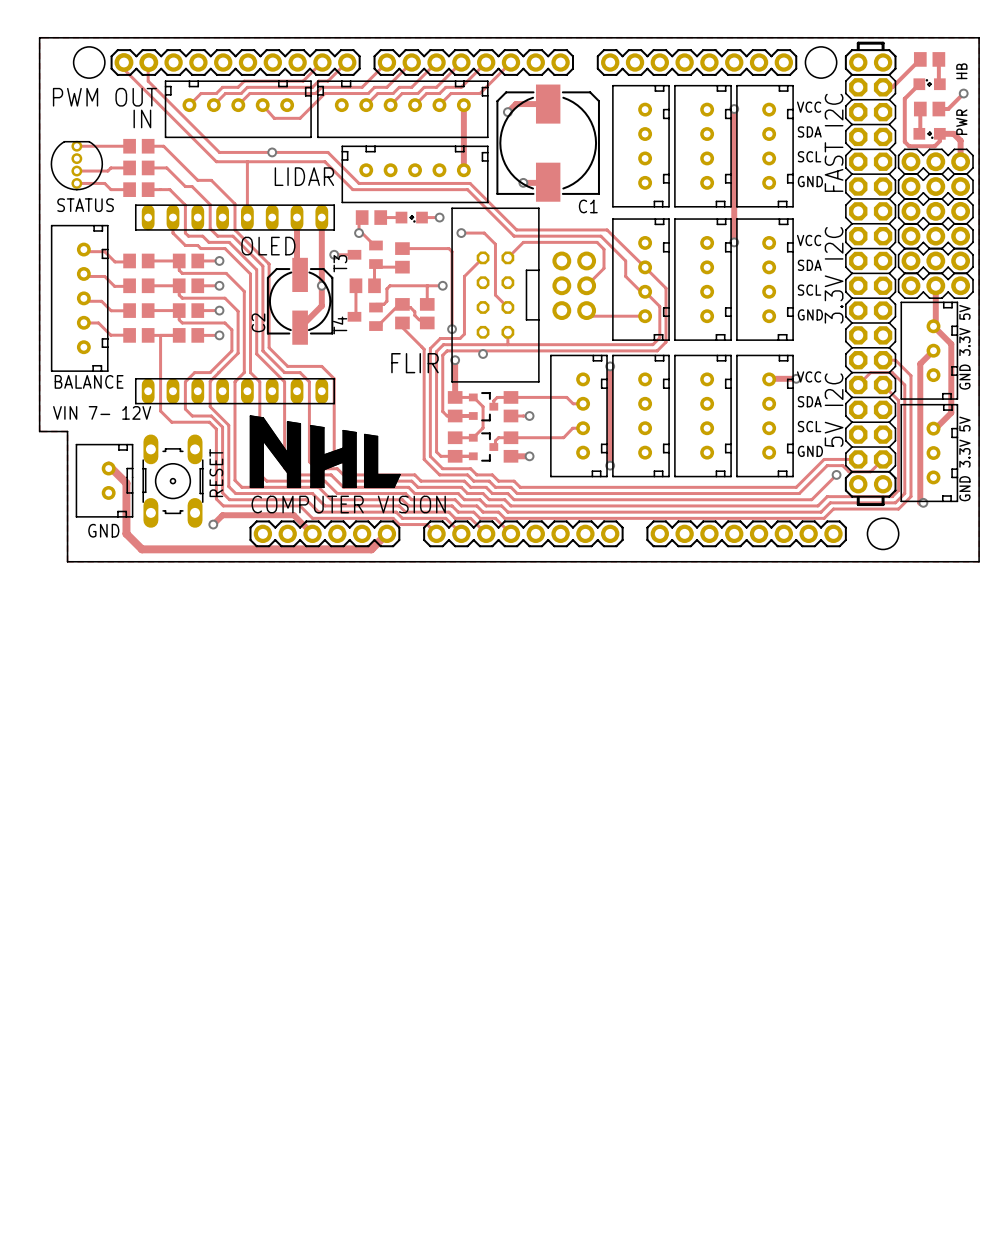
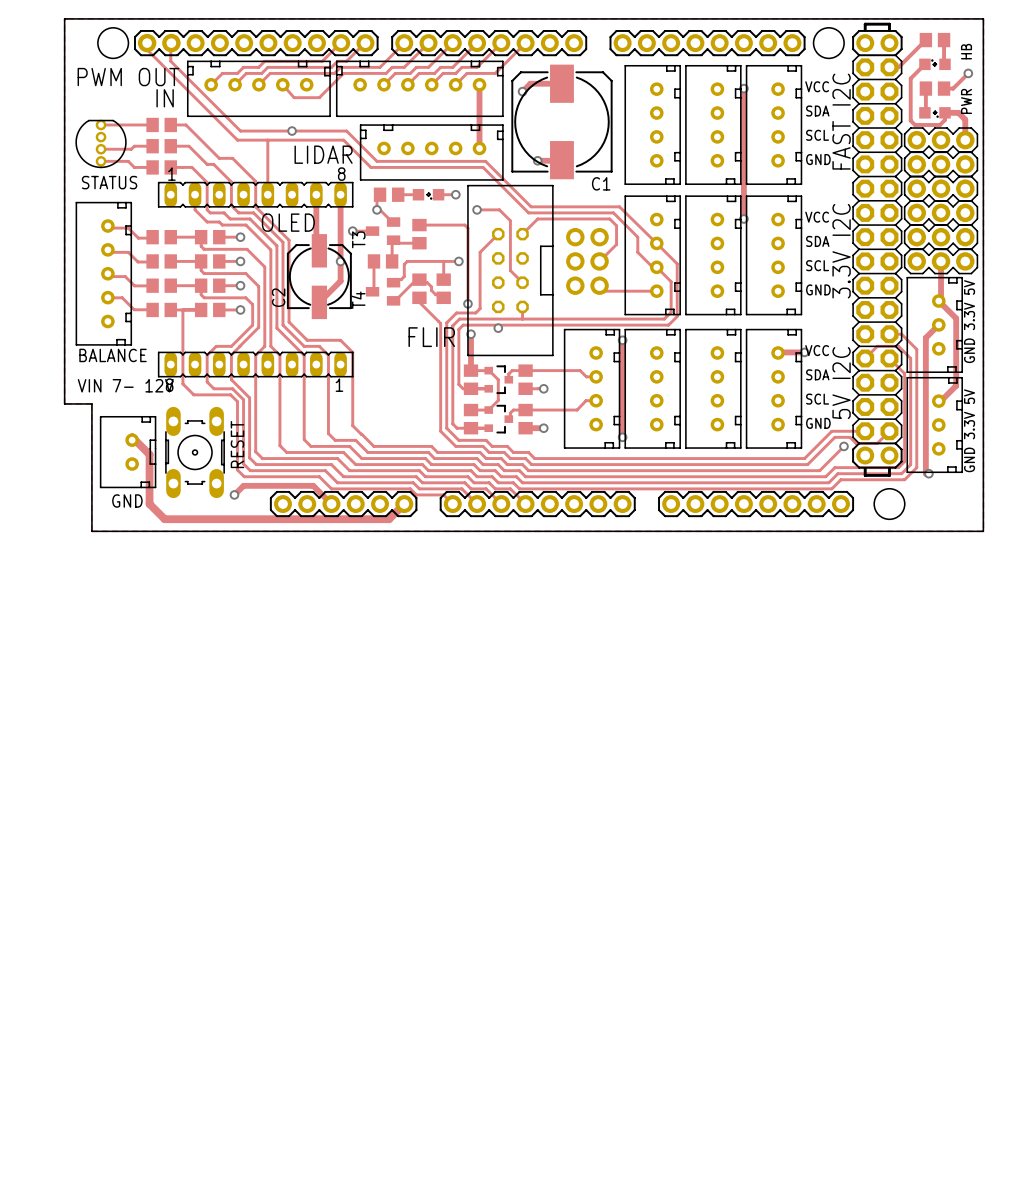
part footprint: [135, 204, 335, 231] -> [157, 181, 354, 208]
part footprint: [135, 378, 335, 405] -> [157, 351, 354, 378]
drawing: [249, 415, 401, 488] -> none

